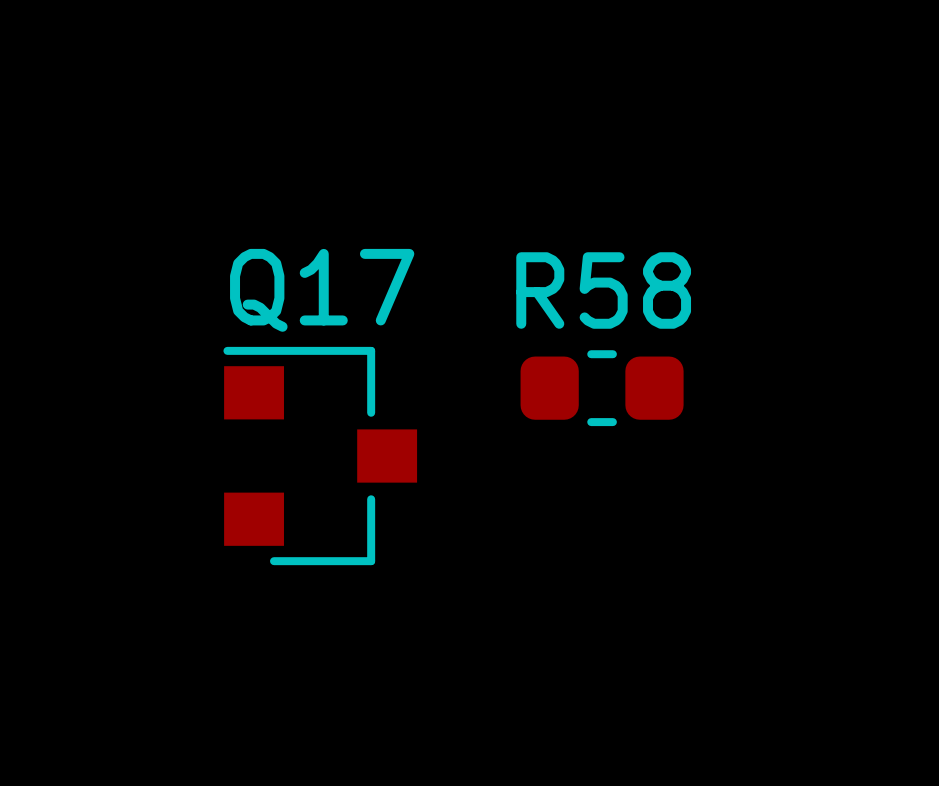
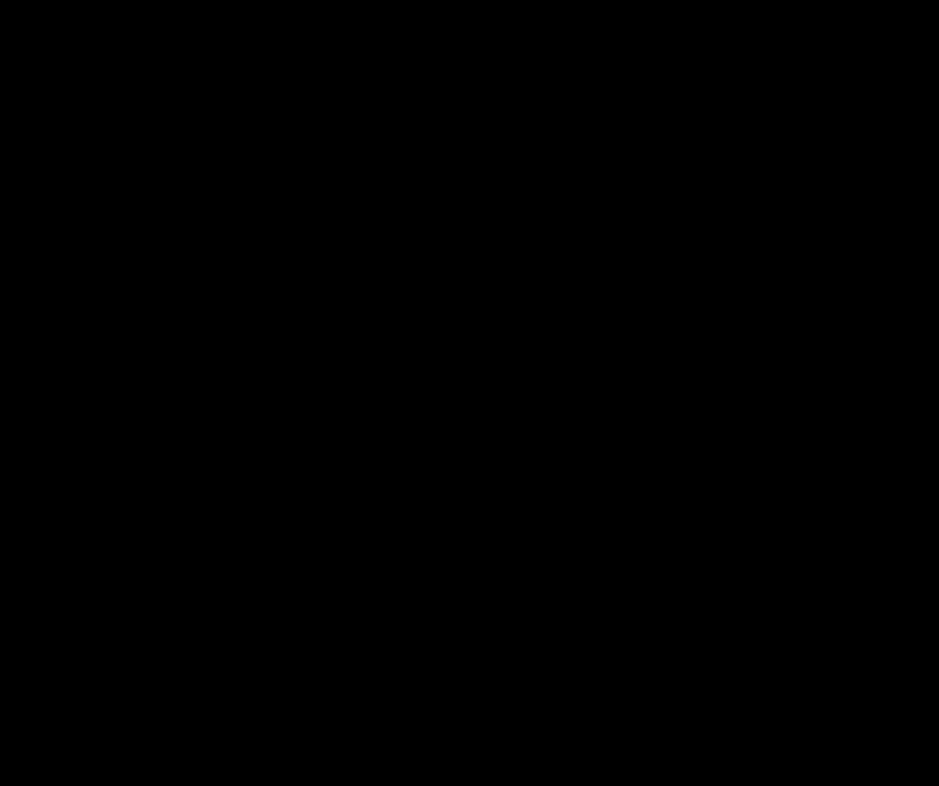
R58: (602, 388) -> none
Q17: (320, 456) -> none

